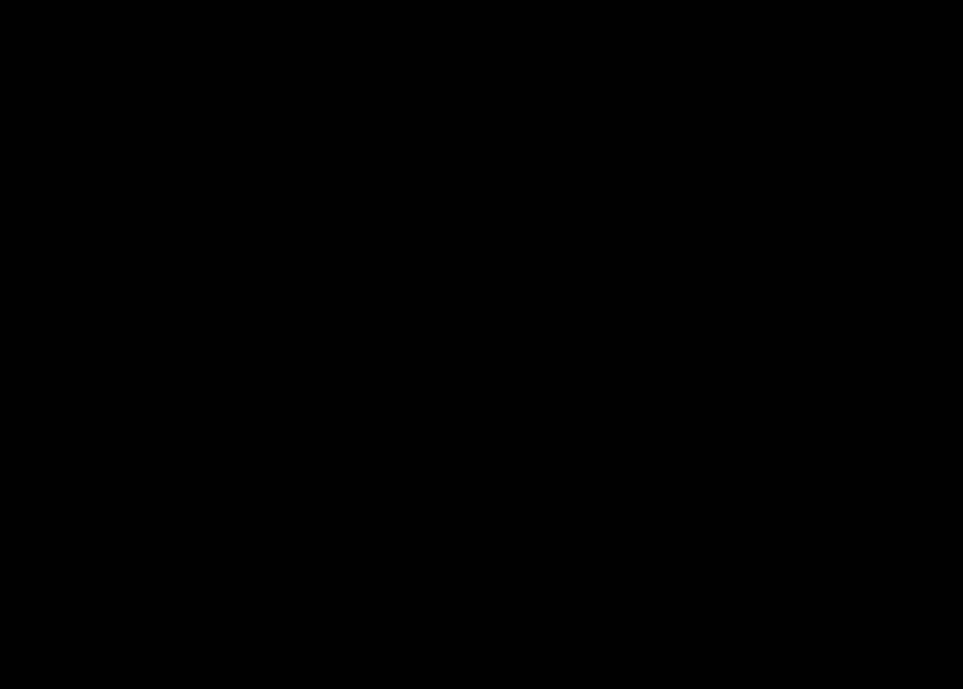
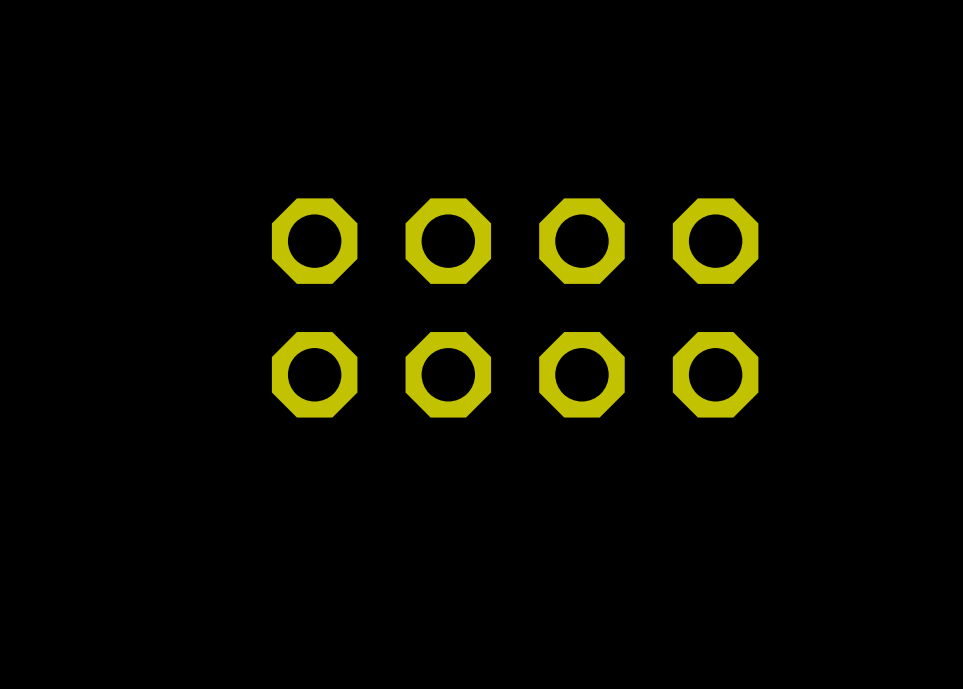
part: none -> (515, 307)

